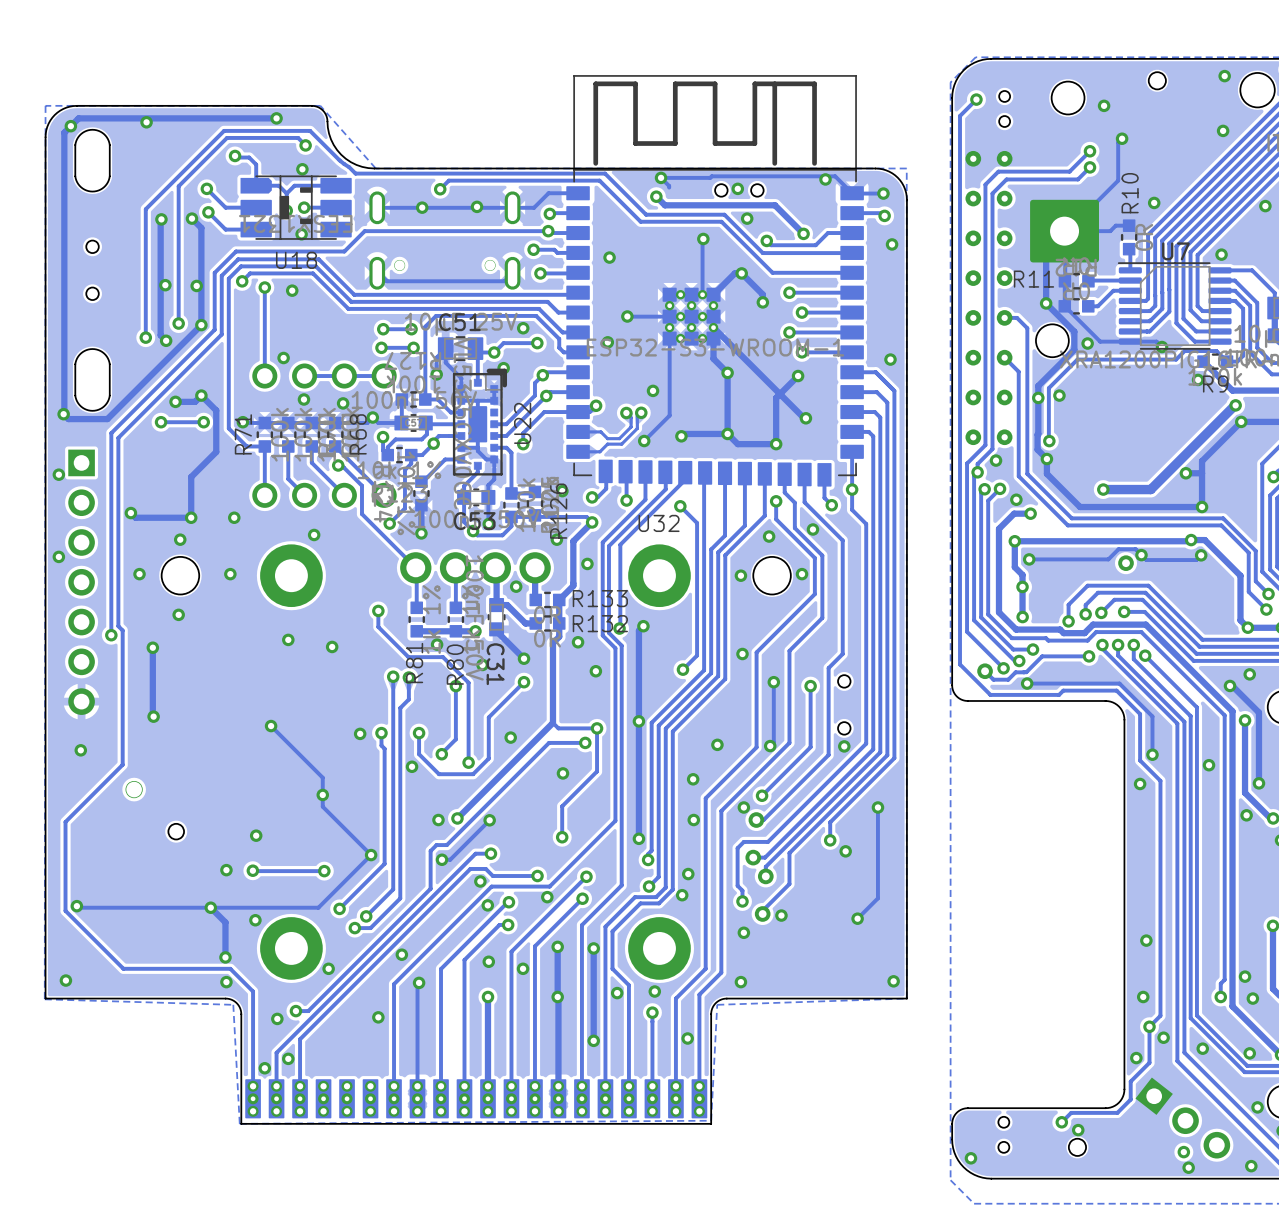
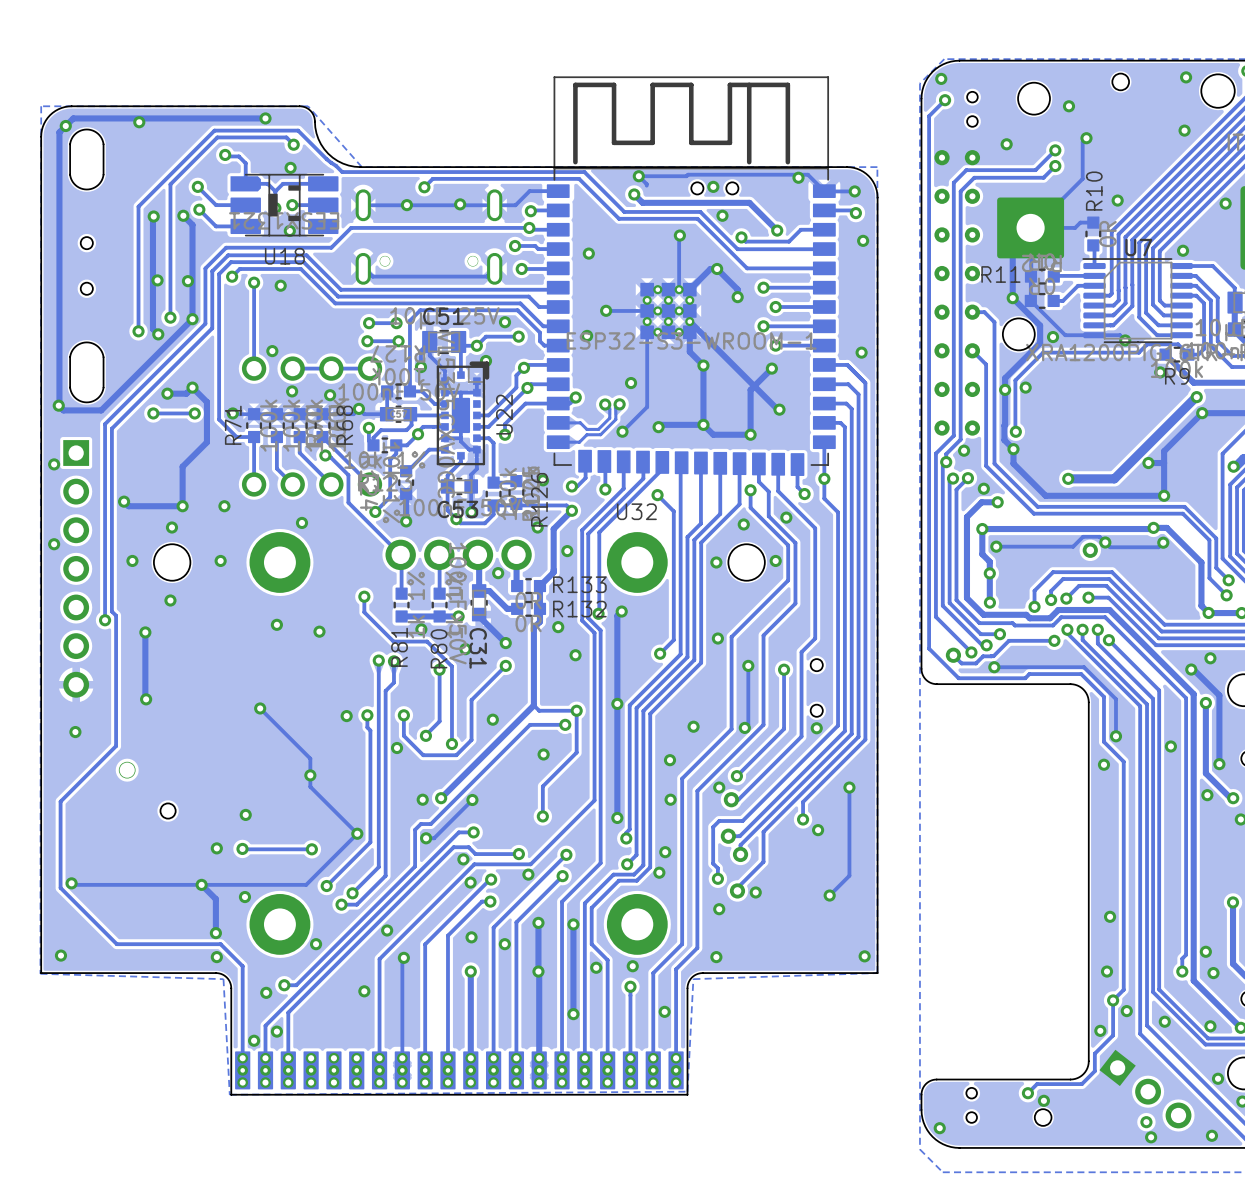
via: none -> (941, 78)
via: none -> (1006, 144)

